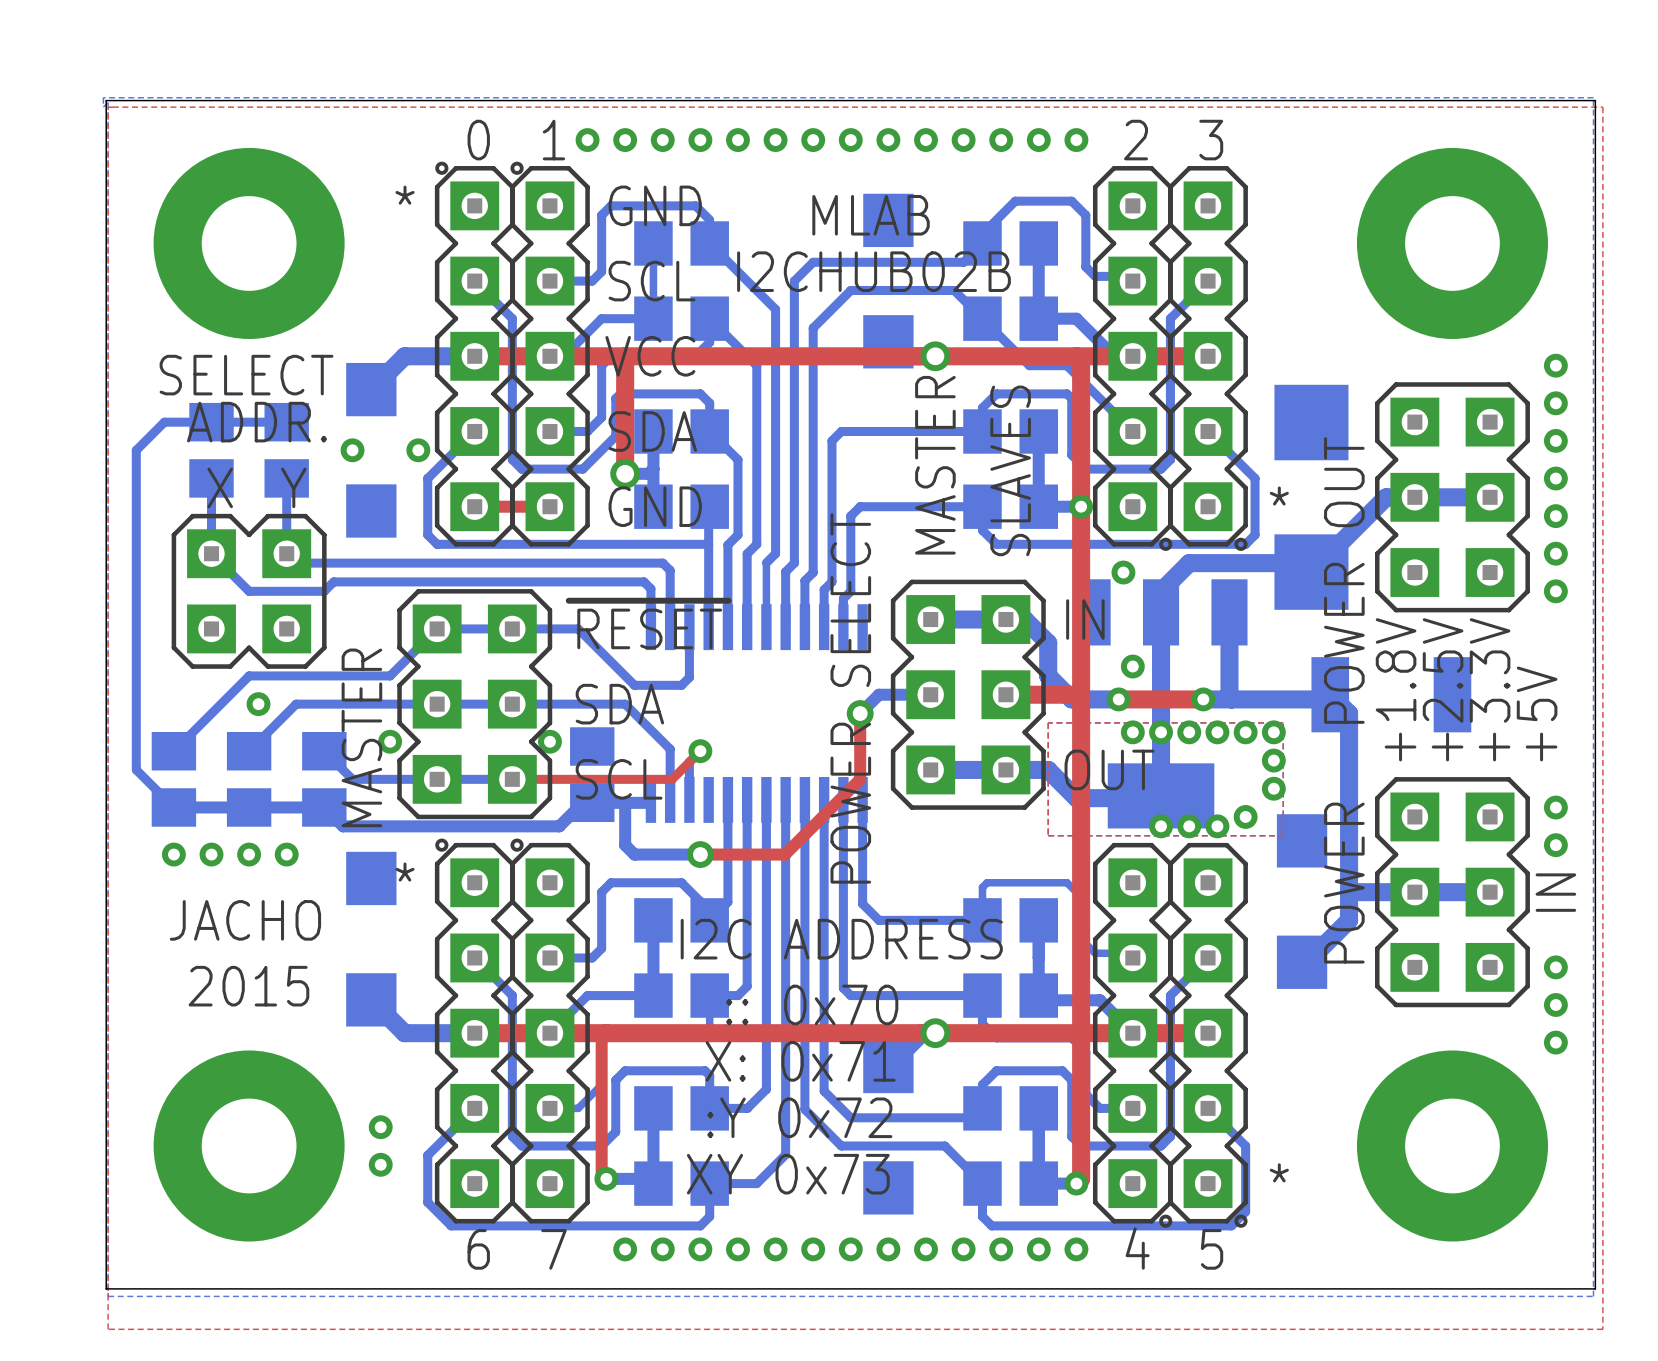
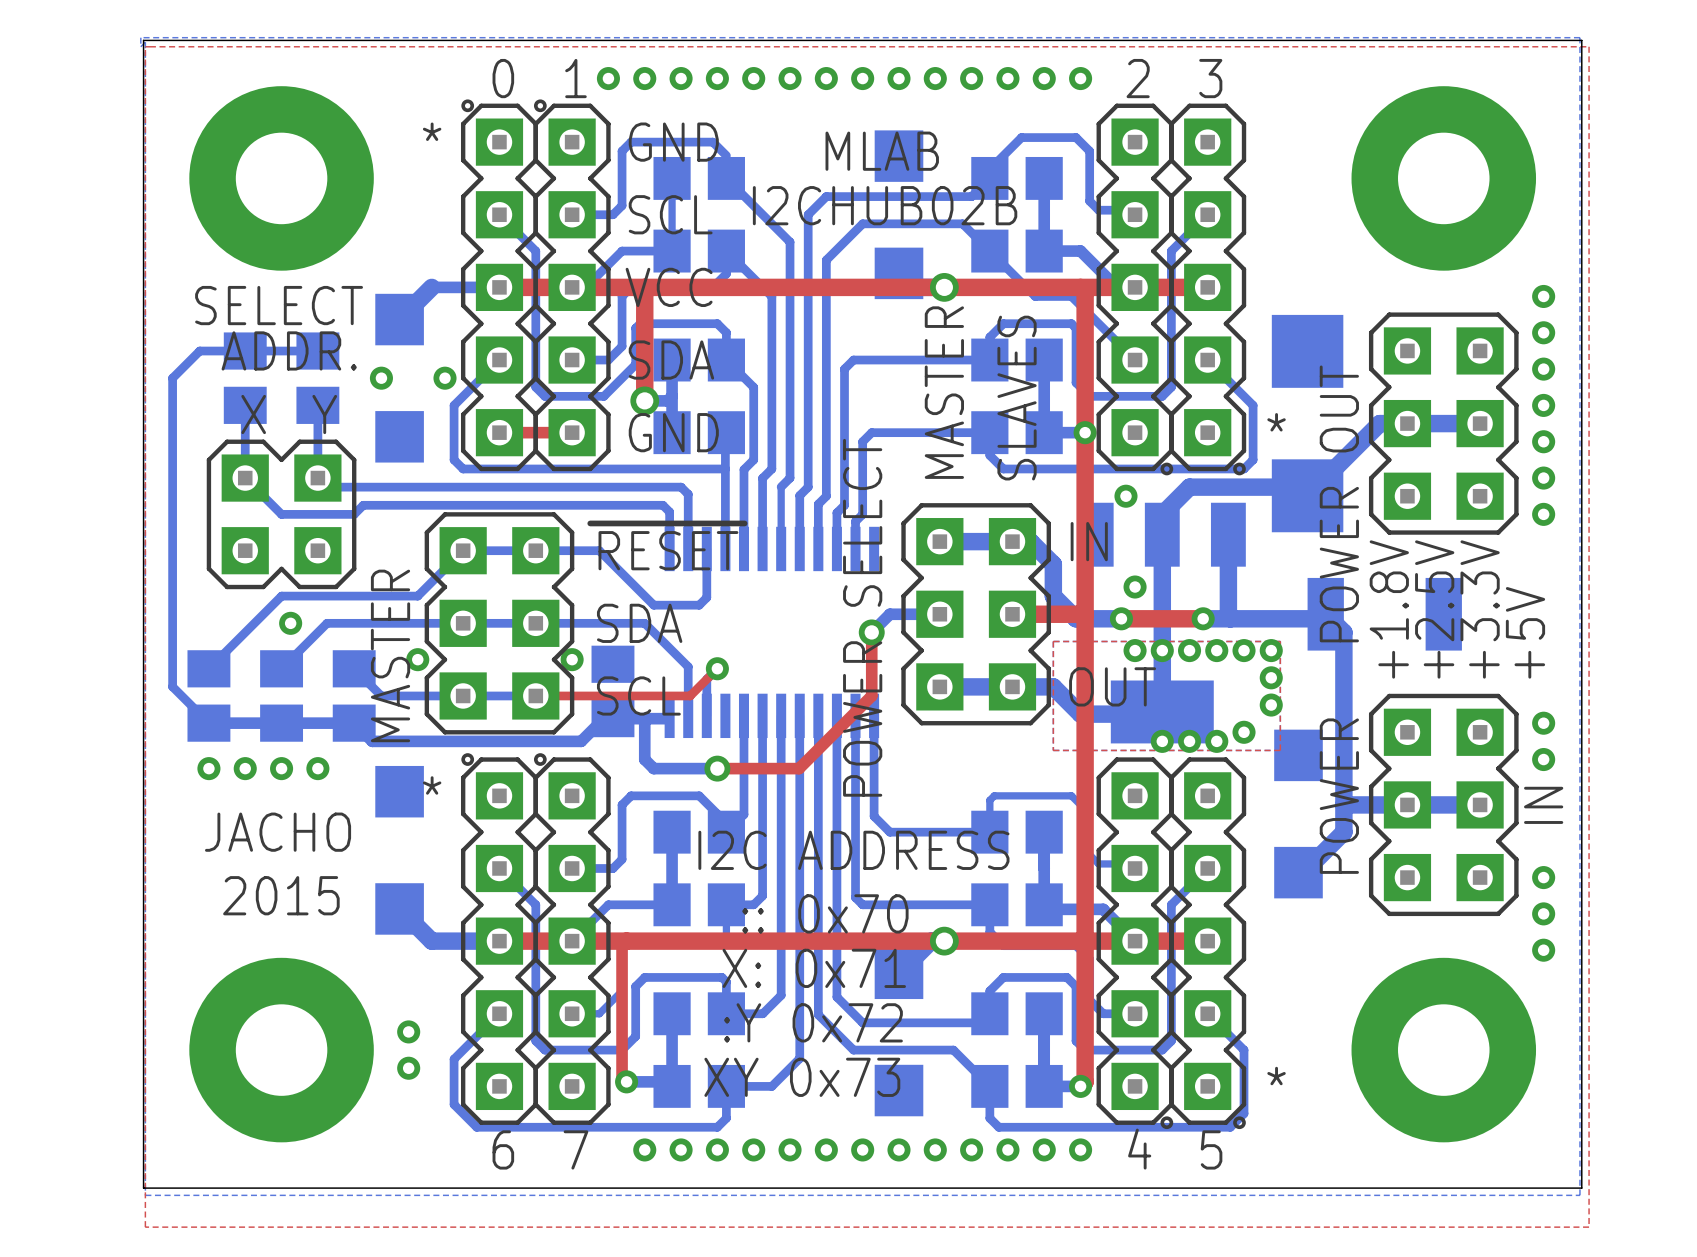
bottom track width: thick (404, 356) (474, 356) -> thin (431, 287) (499, 287)

